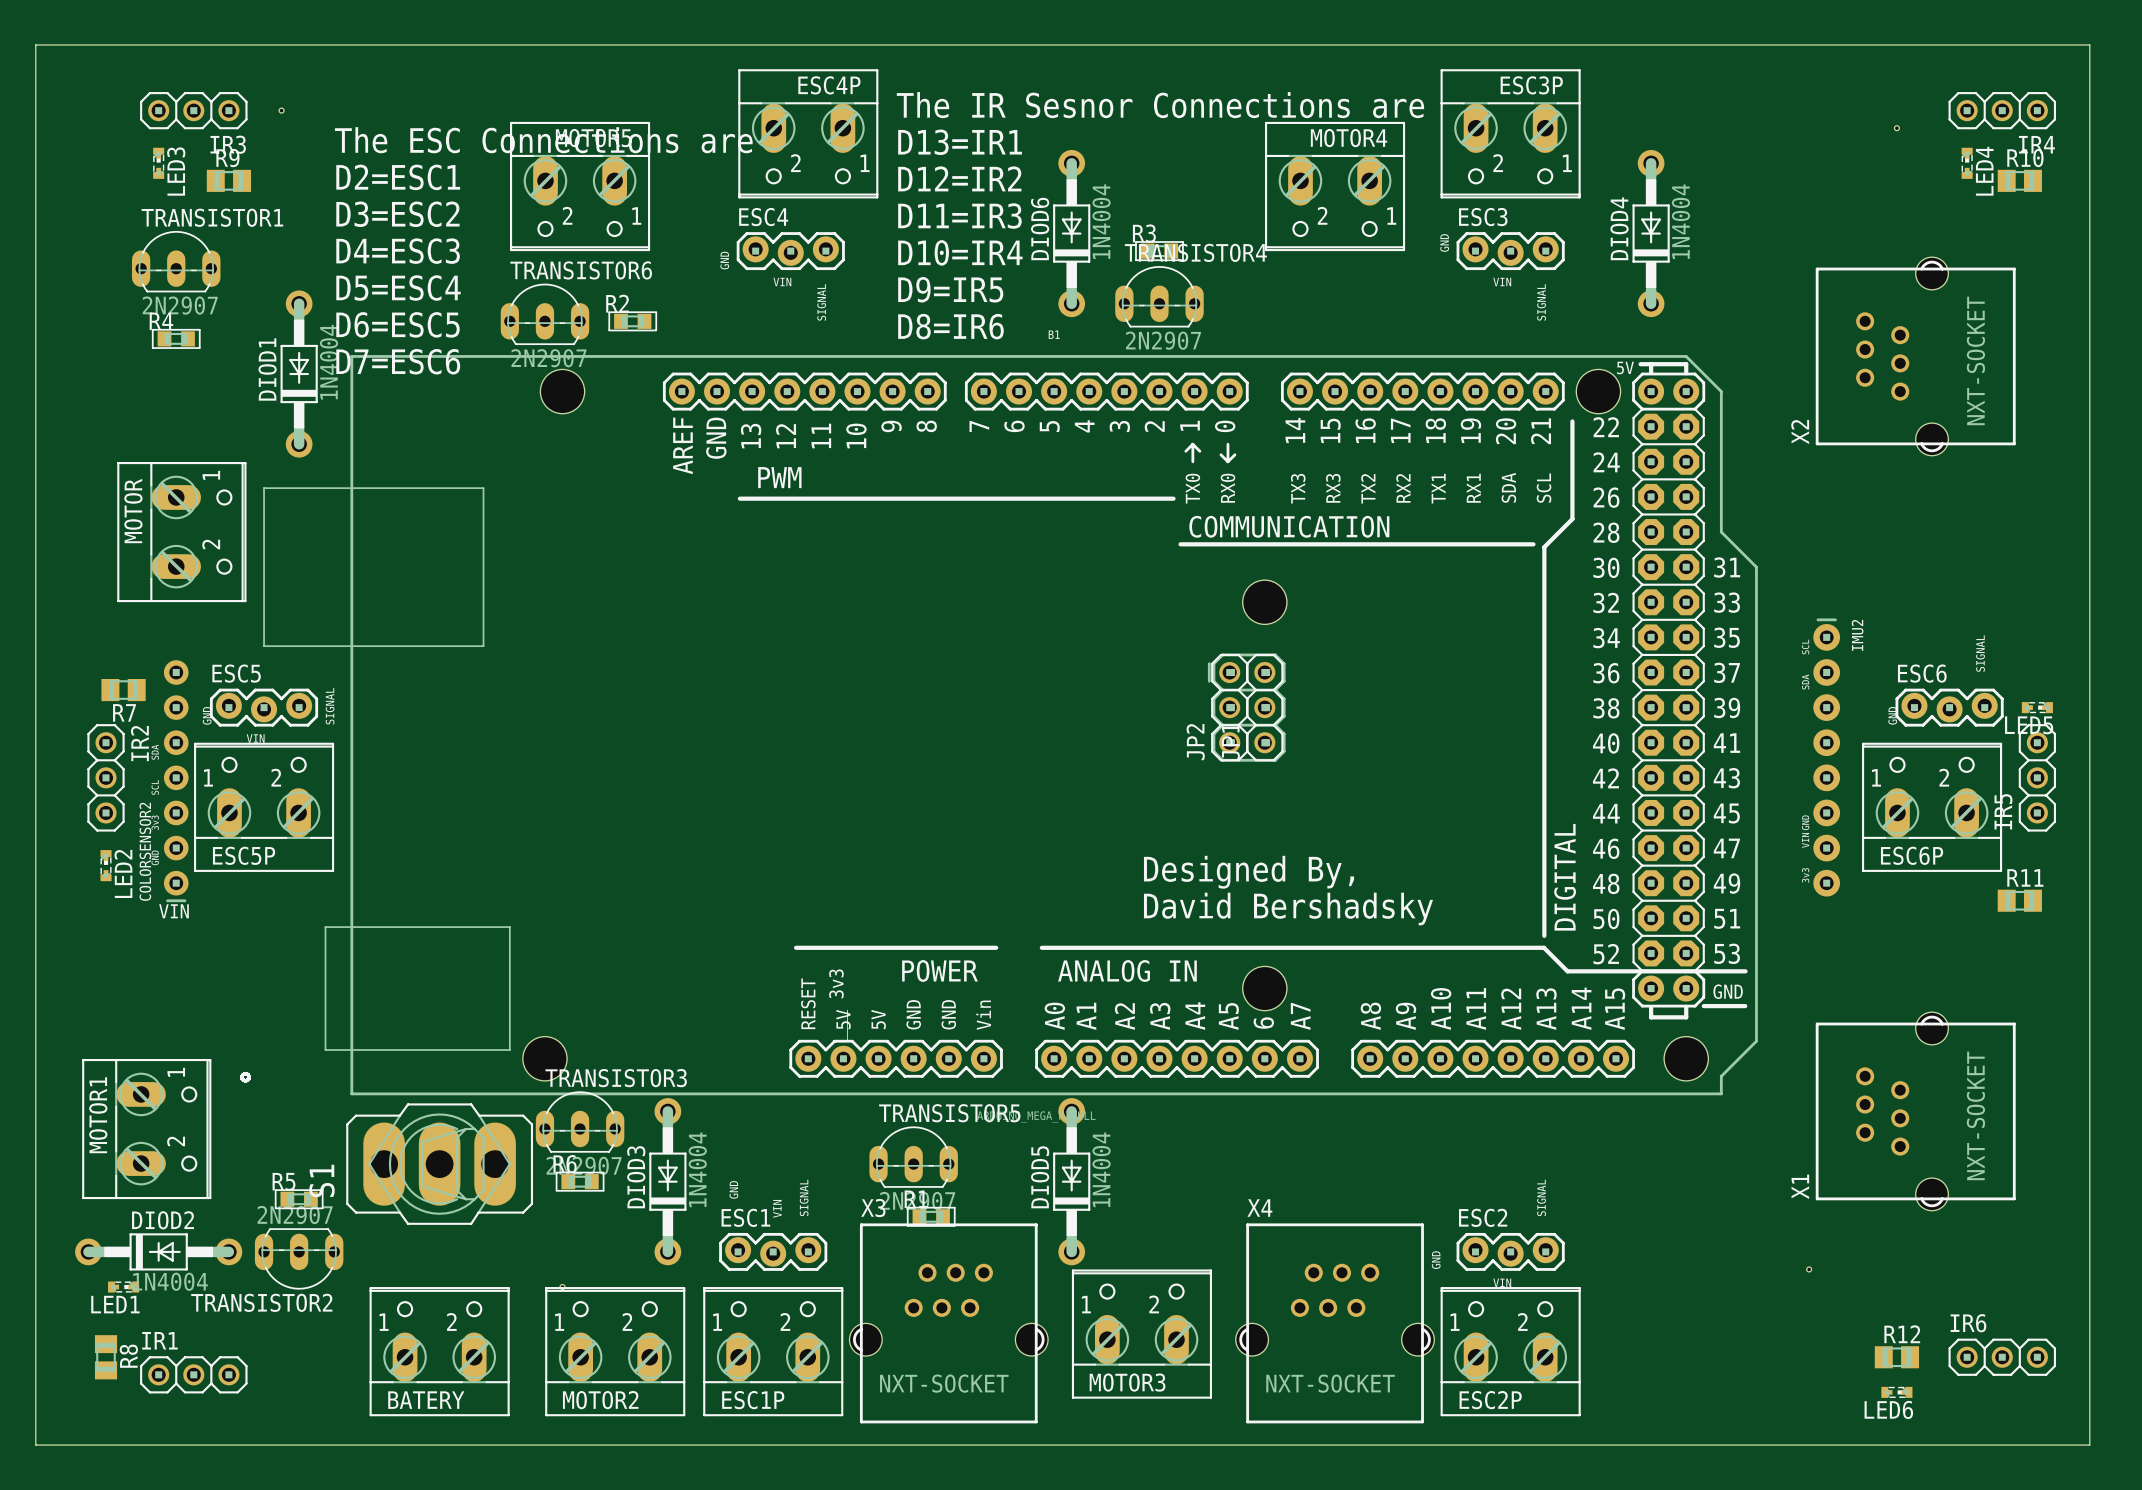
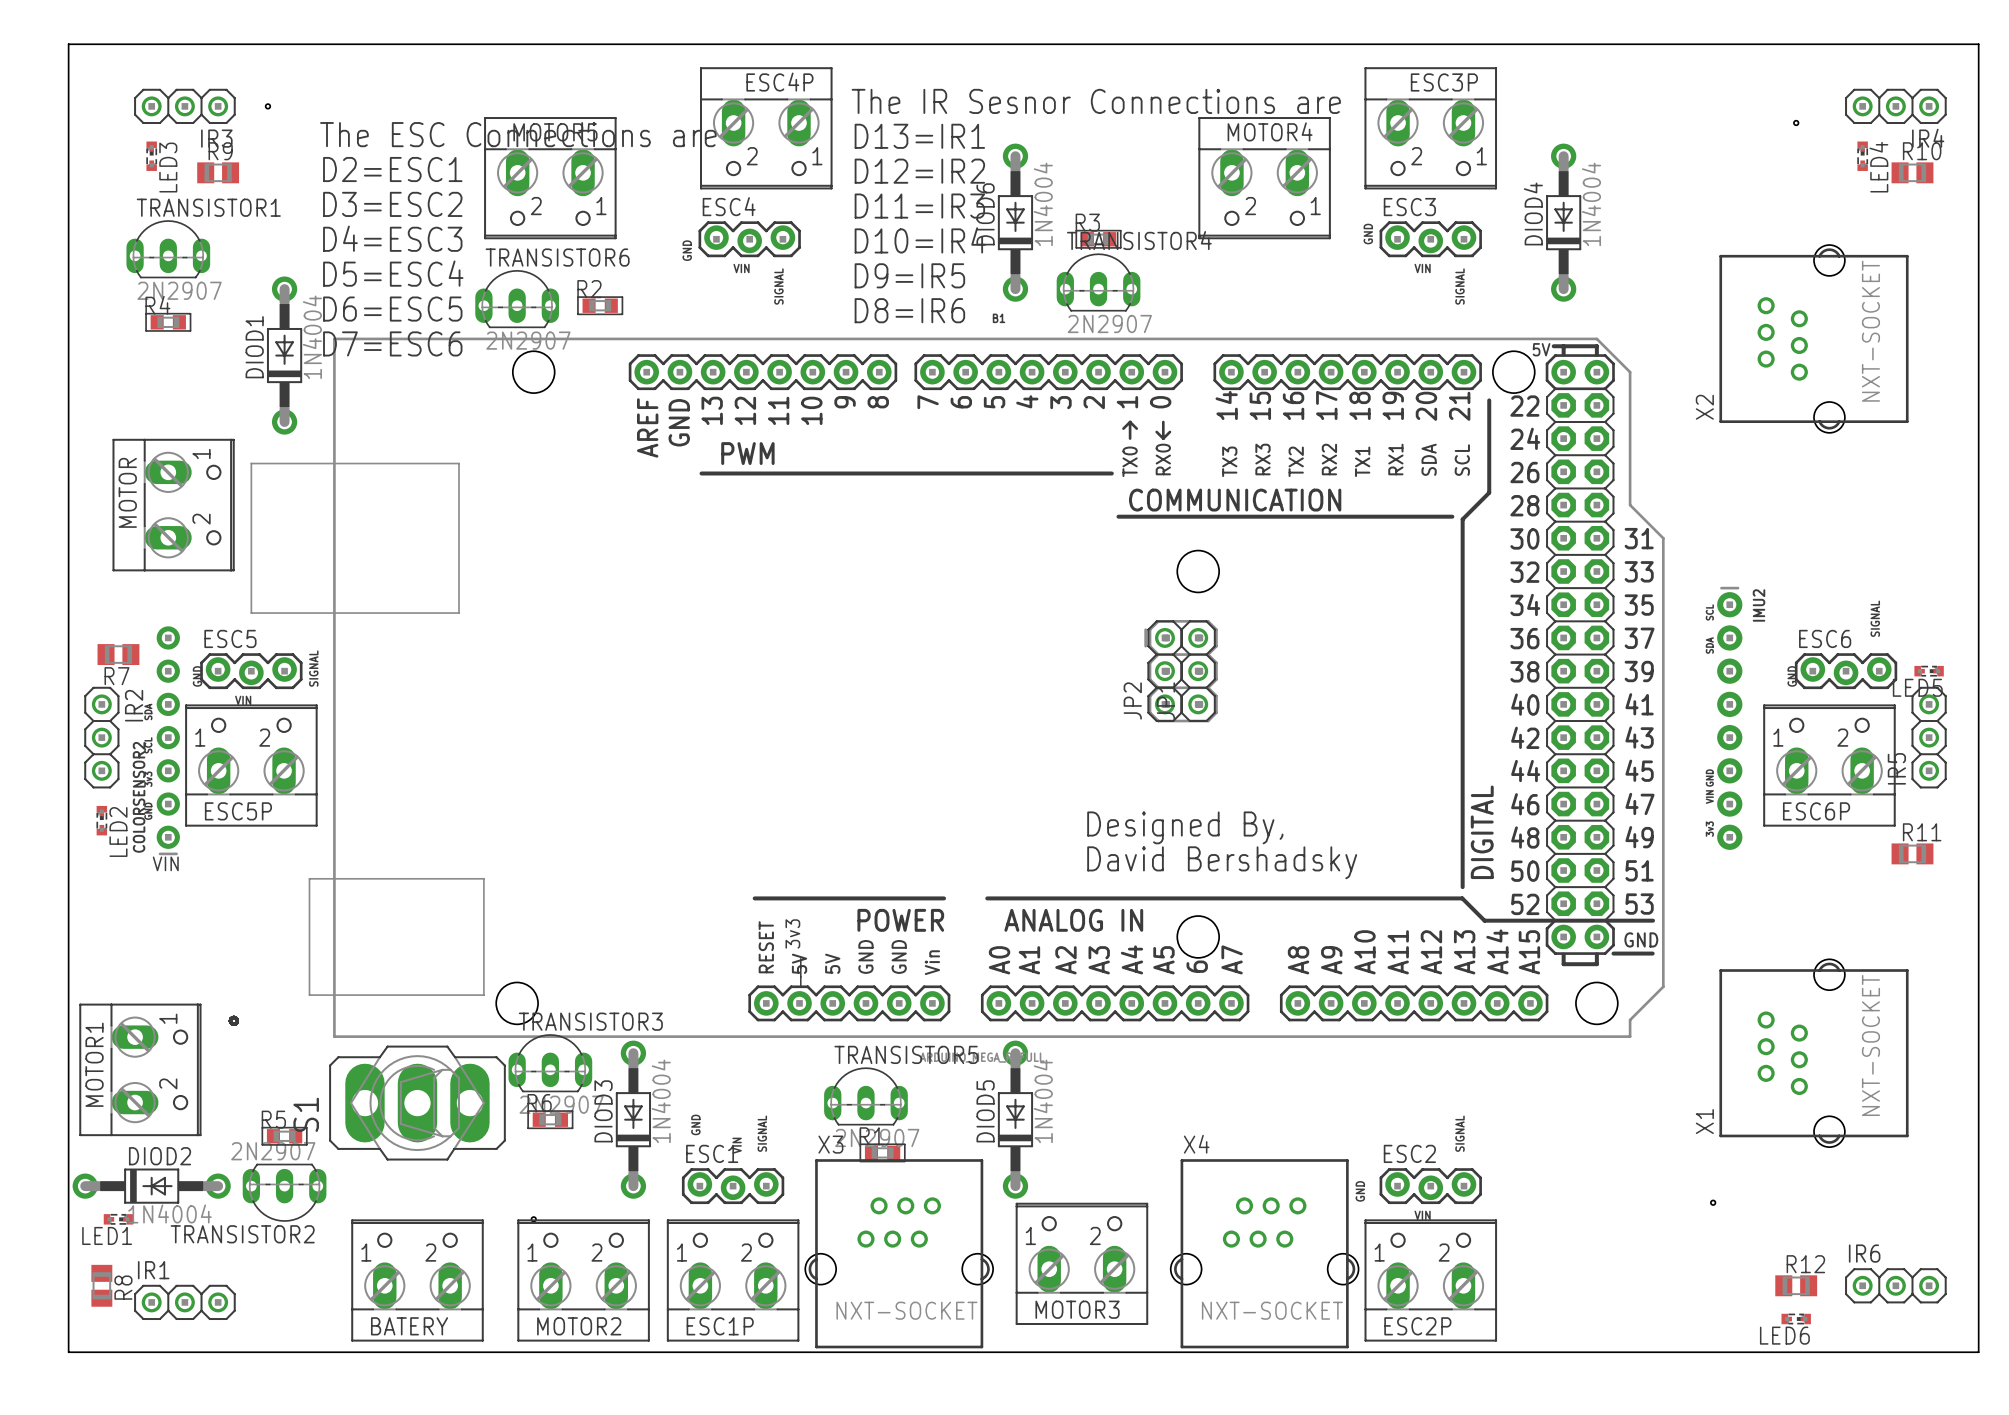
board edge: (70, 44) (35, 44) (35, 1445) (2089, 1445) (2089, 1427) -> (68, 44) (68, 1352) (1978, 1352)

